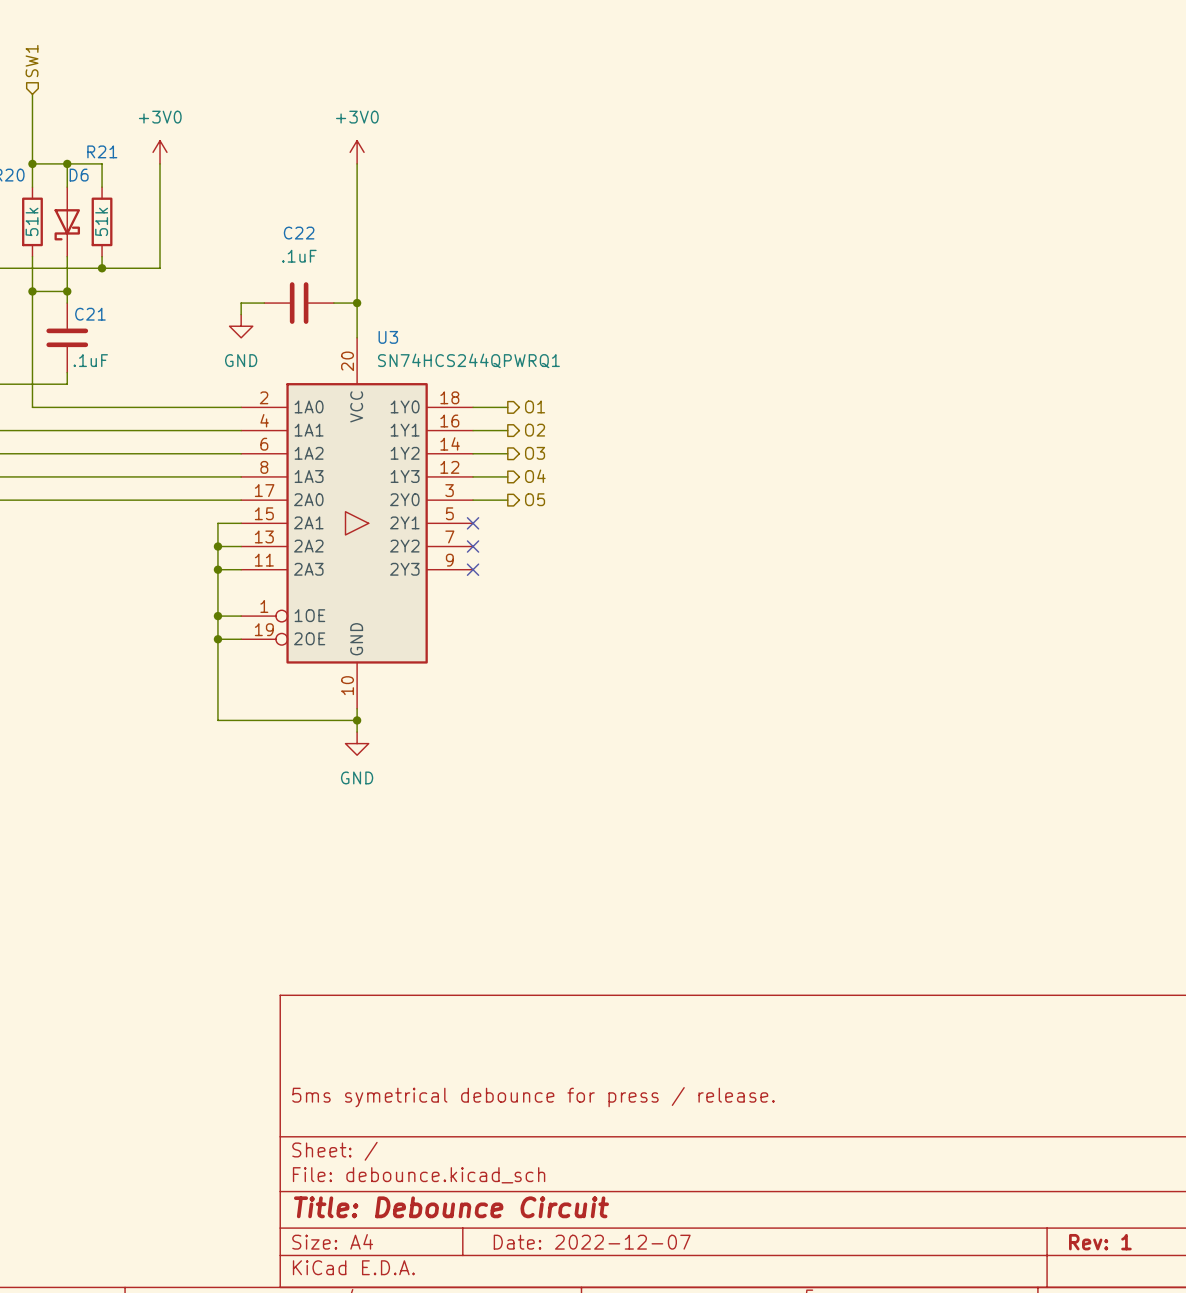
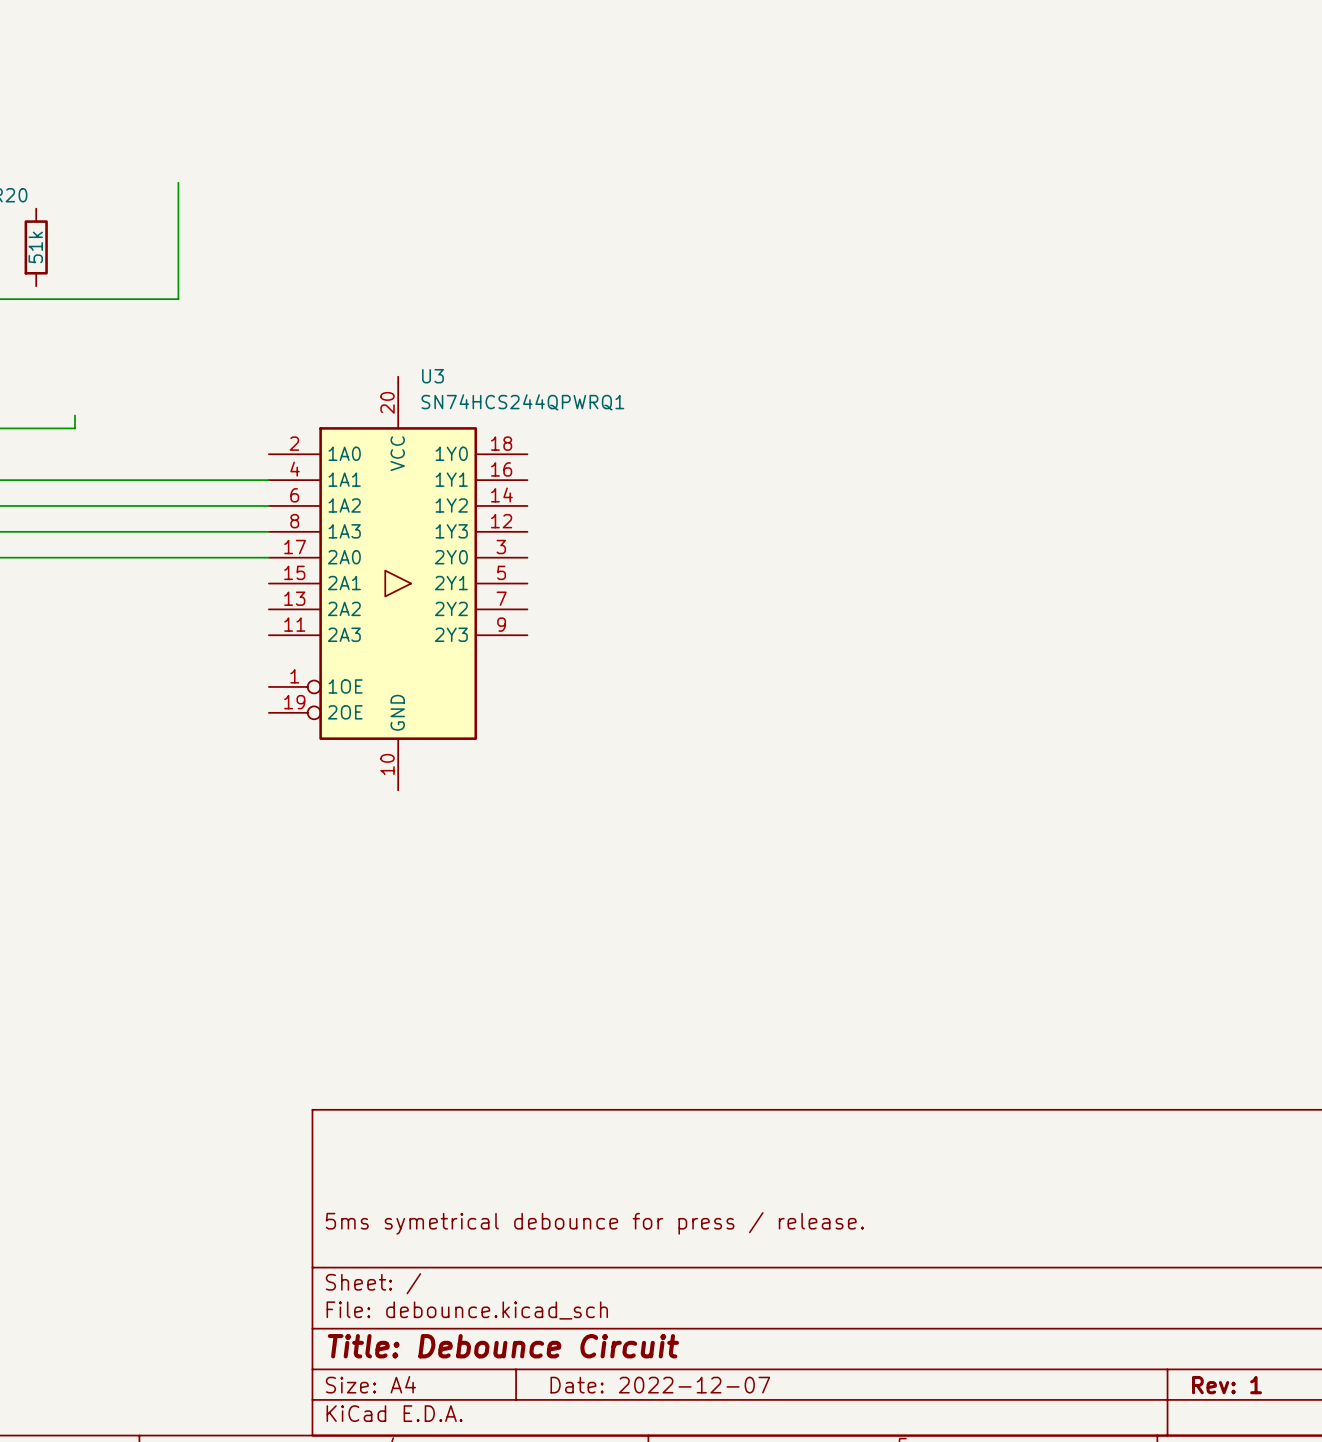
hierarchical label: SW1 (32, 61) -> none
wire: (32, 94) (32, 187) -> none
power symbol: +3V0 (160, 152) -> none
power symbol: +3V0 (357, 152) -> none
wire: (32, 163) (102, 163) (102, 187) -> none
junction: (32, 163) -> none
wire: (67, 163) (67, 187) -> none
junction: (67, 163) -> none
wire: (357, 163) (357, 337) -> none
D6: (67, 221) -> none
R21: 51k (102, 221) -> none
wire: (32, 256) (32, 407) (241, 407) -> none
wire: (67, 256) (67, 303) -> none
wire: (102, 256) (102, 268) -> none
junction: (102, 268) -> none
wire: (32, 291) (67, 291) -> none
junction: (32, 291) -> none
junction: (67, 291) -> none
wire: (264, 303) (241, 303) (241, 314) -> none
C22: .1uF (299, 303) -> none
wire: (333, 303) (357, 303) -> none
junction: (357, 303) -> none
power symbol: GND (241, 326) -> none
C21: .1uF (67, 337) -> none
hierarchical label: O1 (535, 406) -> none
wire: (473, 407) (507, 407) -> none
wire: (473, 430) (507, 430) -> none
hierarchical label: O2 (535, 430) -> none
wire: (473, 453) (507, 453) -> none
hierarchical label: O3 (535, 453) -> none
wire: (473, 476) (507, 476) -> none
hierarchical label: O4 (535, 476) -> none
hierarchical label: O5 (535, 499) -> none
wire: (473, 500) (507, 500) -> none
wire: (241, 523) (217, 523) (217, 720) (357, 720) -> none
no-connect mark: (473, 523) -> none
wire: (217, 546) (241, 546) -> none
junction: (217, 546) -> none
no-connect mark: (473, 546) -> none
wire: (217, 569) (241, 569) -> none
junction: (217, 569) -> none
no-connect mark: (473, 569) -> none
wire: (217, 616) (241, 616) -> none
junction: (217, 616) -> none
wire: (217, 639) (241, 639) -> none
junction: (217, 639) -> none
wire: (357, 708) (357, 732) -> none
junction: (357, 720) -> none
power symbol: GND (357, 743) -> none

